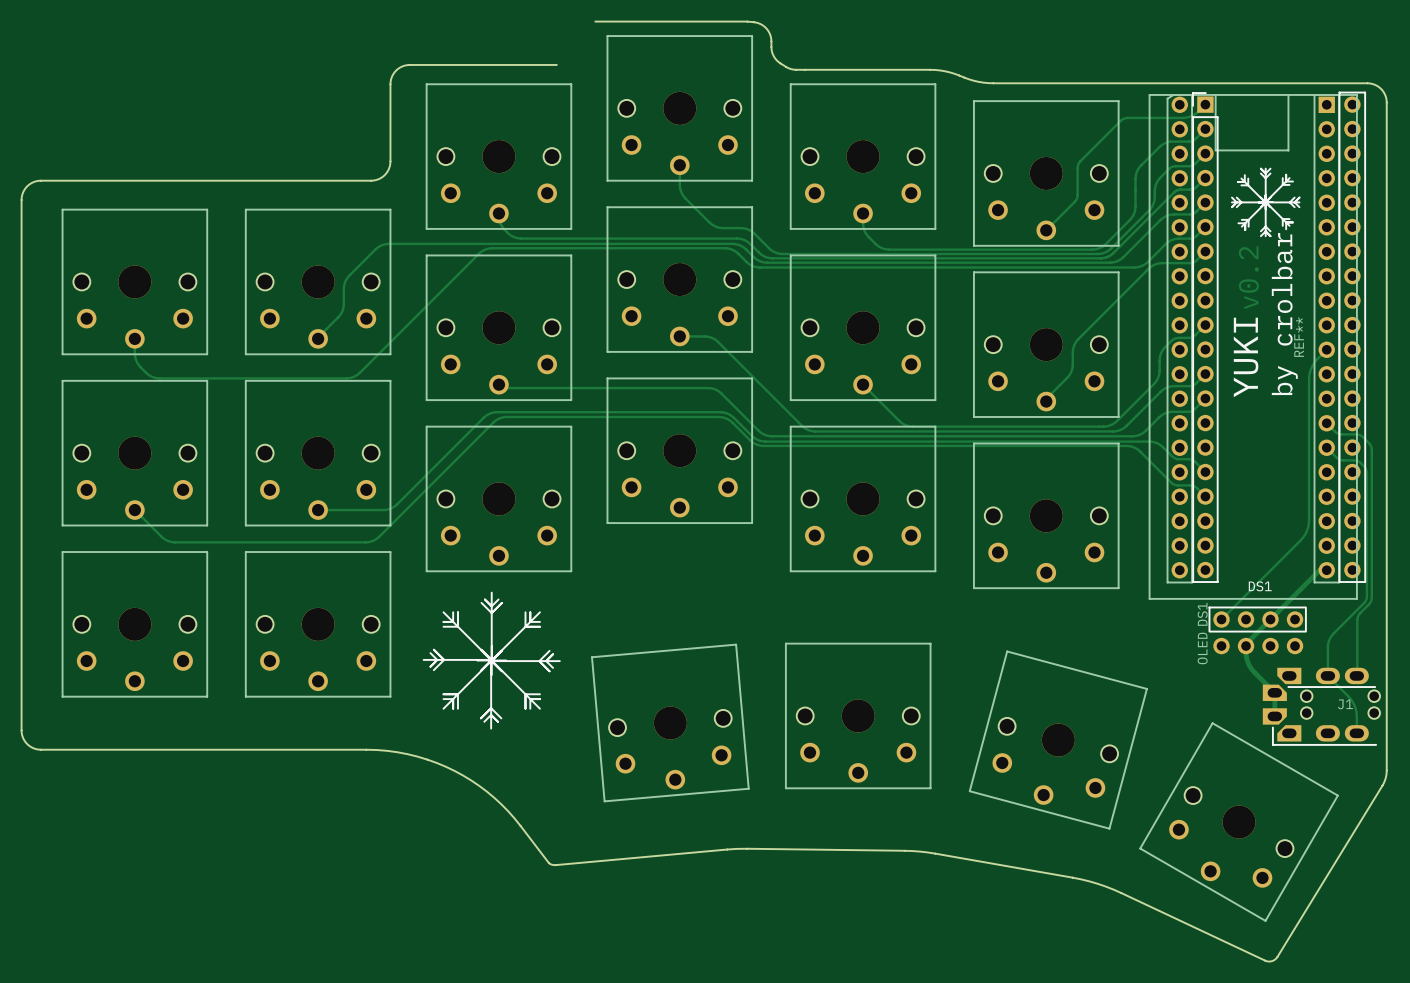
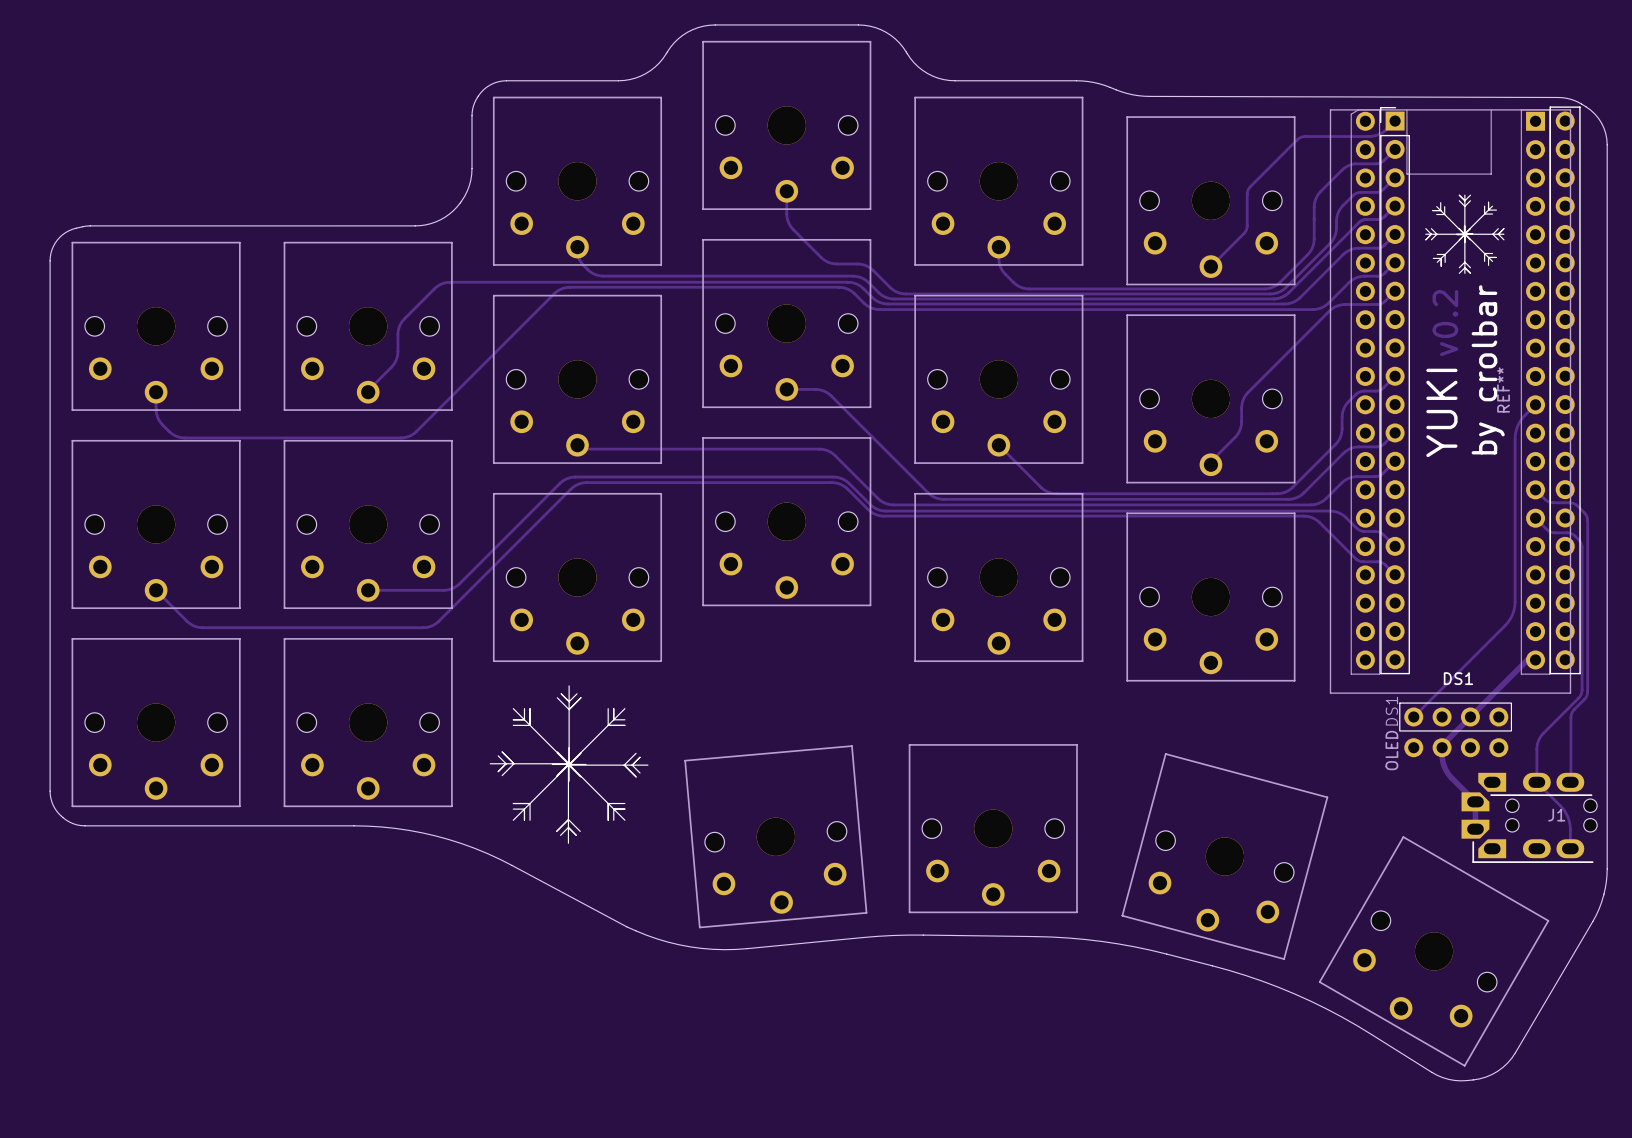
board edge: (595, 21) (617, 21) -> none
board edge: (741, 21) (756, 22) (766, 28) (770, 36) (773, 56) (786, 66) (794, 69) (825, 69) -> (858, 24) (875, 27) (890, 35) (899, 42) (914, 62) (927, 73) (943, 79) (955, 80)
board edge: (556, 64) (409, 64) (399, 67) (393, 73) (390, 82) (389, 165) (384, 175) (375, 180) (40, 180) (32, 182) (25, 187) (21, 199) (21, 730) (25, 742) (32, 747) (40, 749) (366, 749) (397, 752) (437, 763) (479, 785) (508, 811) (552, 864) (737, 848) (927, 852) (1097, 883) (1265, 960) (1271, 961) (1277, 956) (1382, 785) (1386, 773) (1385, 96) (1377, 86) (1367, 83) (993, 83) -> (715, 24) (698, 27) (682, 35) (674, 42) (655, 66) (635, 78) (618, 80) (506, 80) (494, 83) (486, 87) (477, 97) (472, 109) (471, 174) (467, 191) (453, 210) (430, 223) (415, 225) (90, 225) (68, 230) (57, 240) (51, 249) (50, 260) (50, 791) (51, 801) (56, 811) (69, 822) (84, 825) (367, 826) (422, 832) (461, 843) (499, 859) (635, 930) (668, 942) (701, 948) (735, 949) (908, 935) (1051, 937) (1134, 946) (1229, 970) (1294, 993) (1341, 1016) (1442, 1077) (1461, 1080) (1485, 1077) (1502, 1067) (1515, 1052) (1596, 915) (1606, 881) (1607, 144) (1603, 128) (1590, 110) (1574, 100) (1562, 97) (1149, 96)

